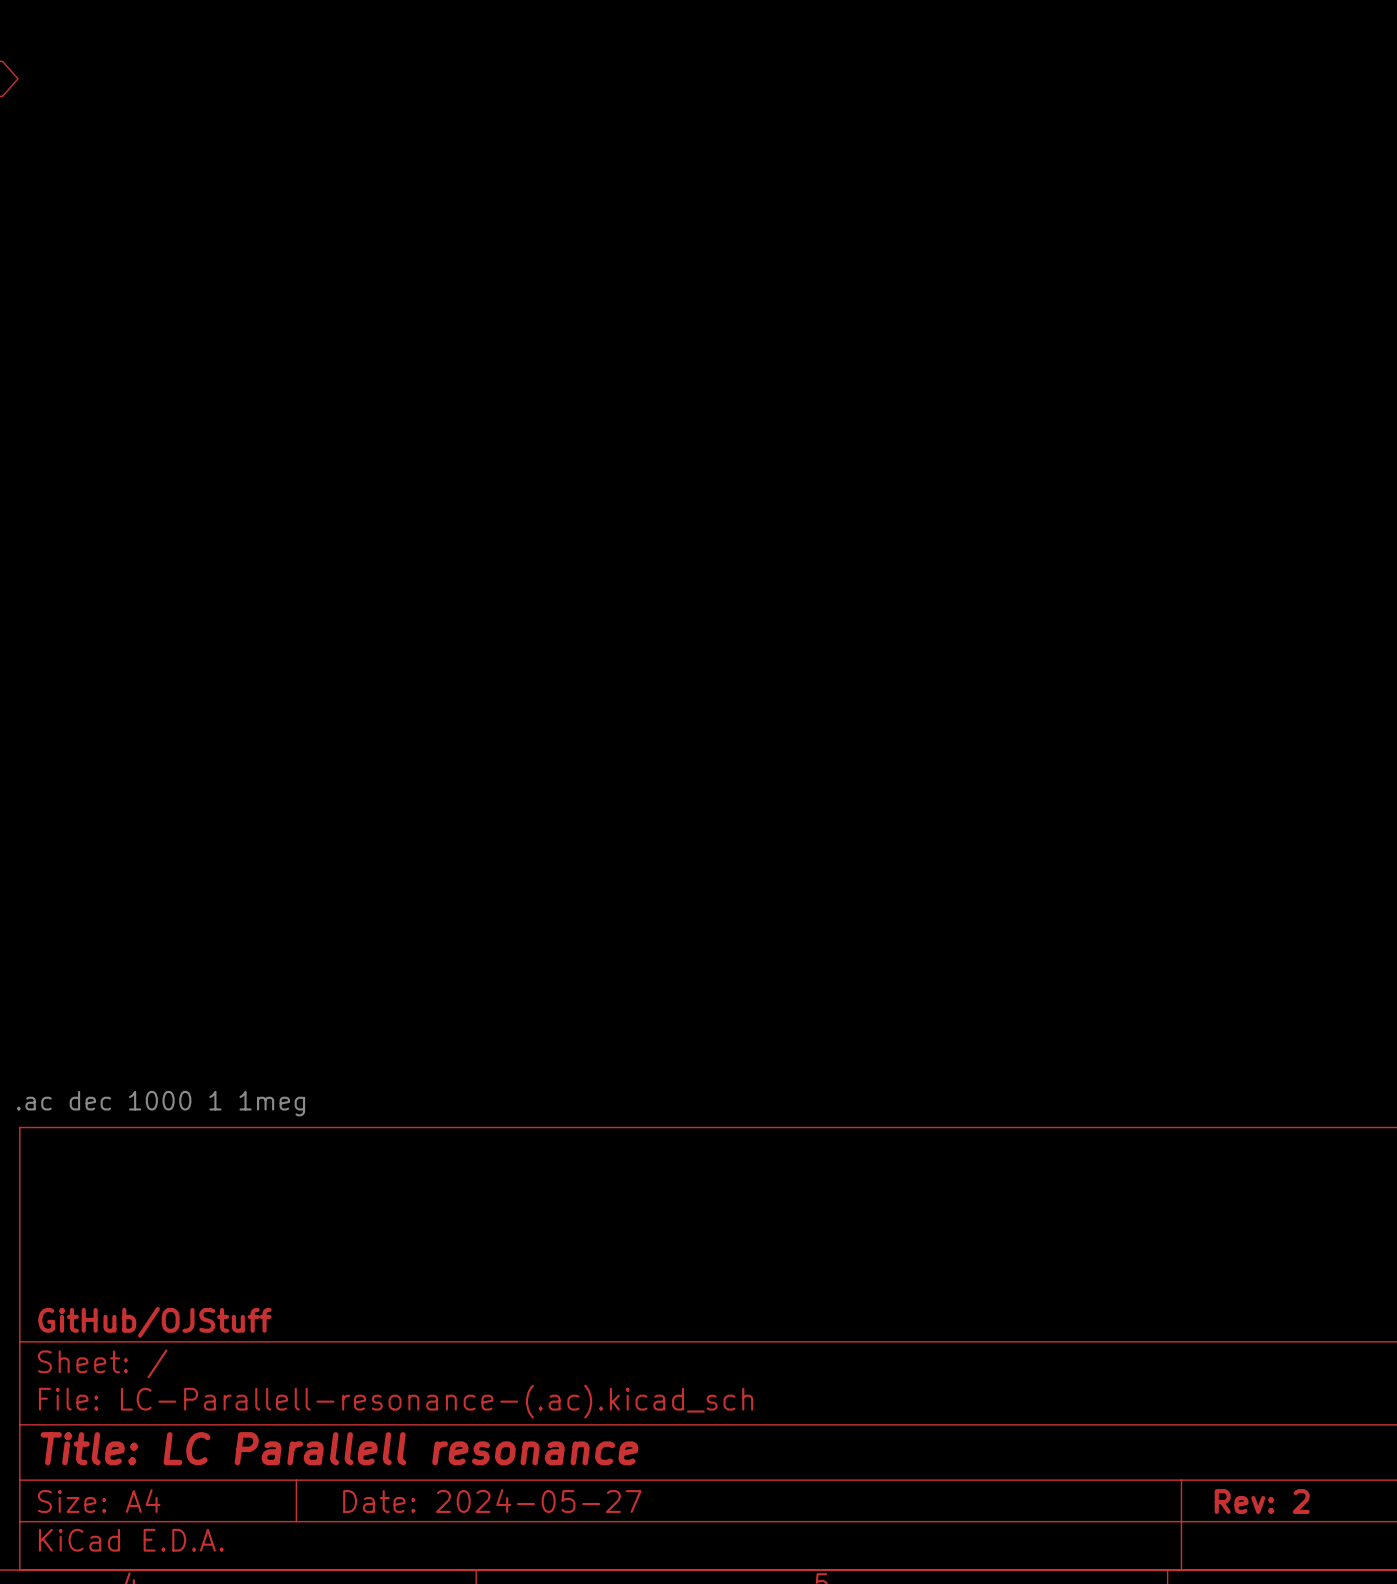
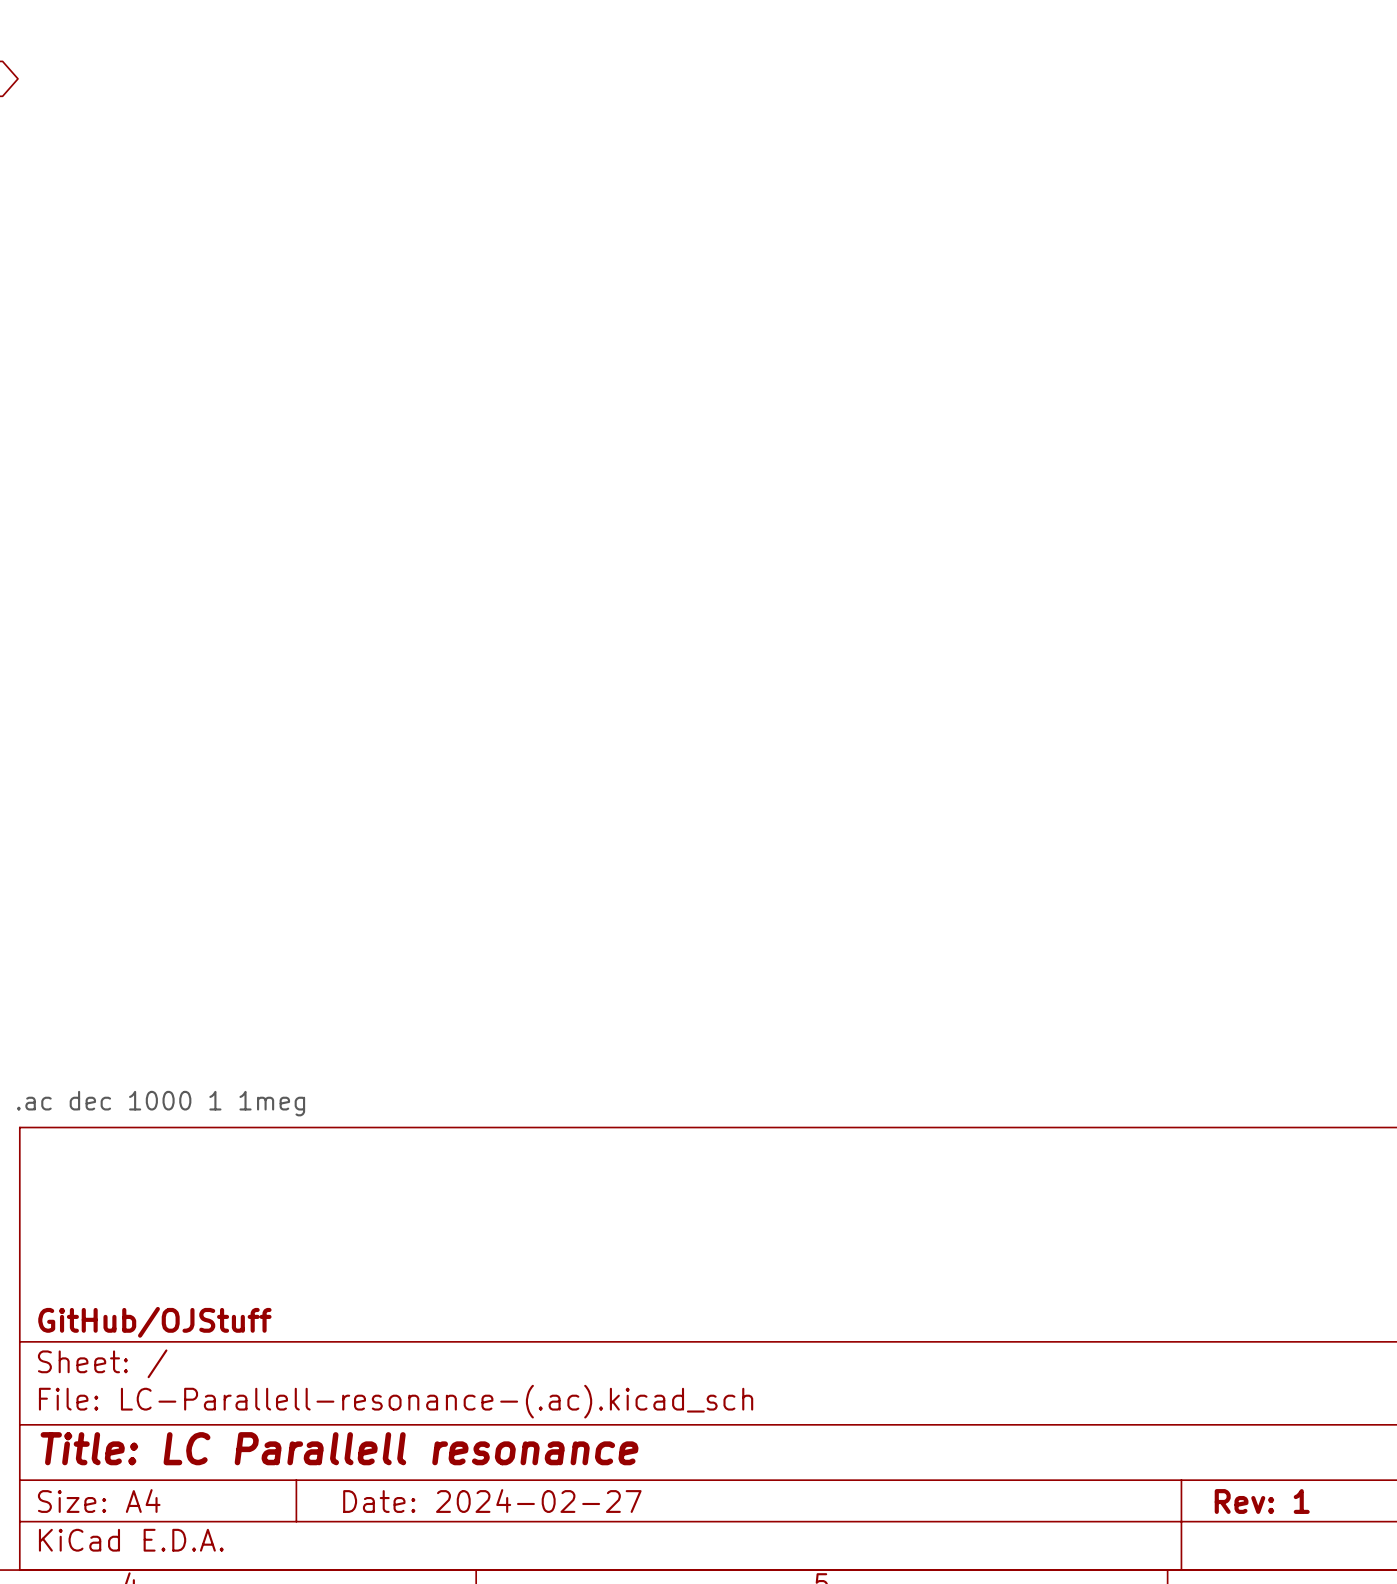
title block: Date: 2024-05-27 (492, 1501) -> Date: 2024-02-27 (492, 1501)
title block: Rev: 2 (1262, 1501) -> Rev: 1 (1262, 1501)

